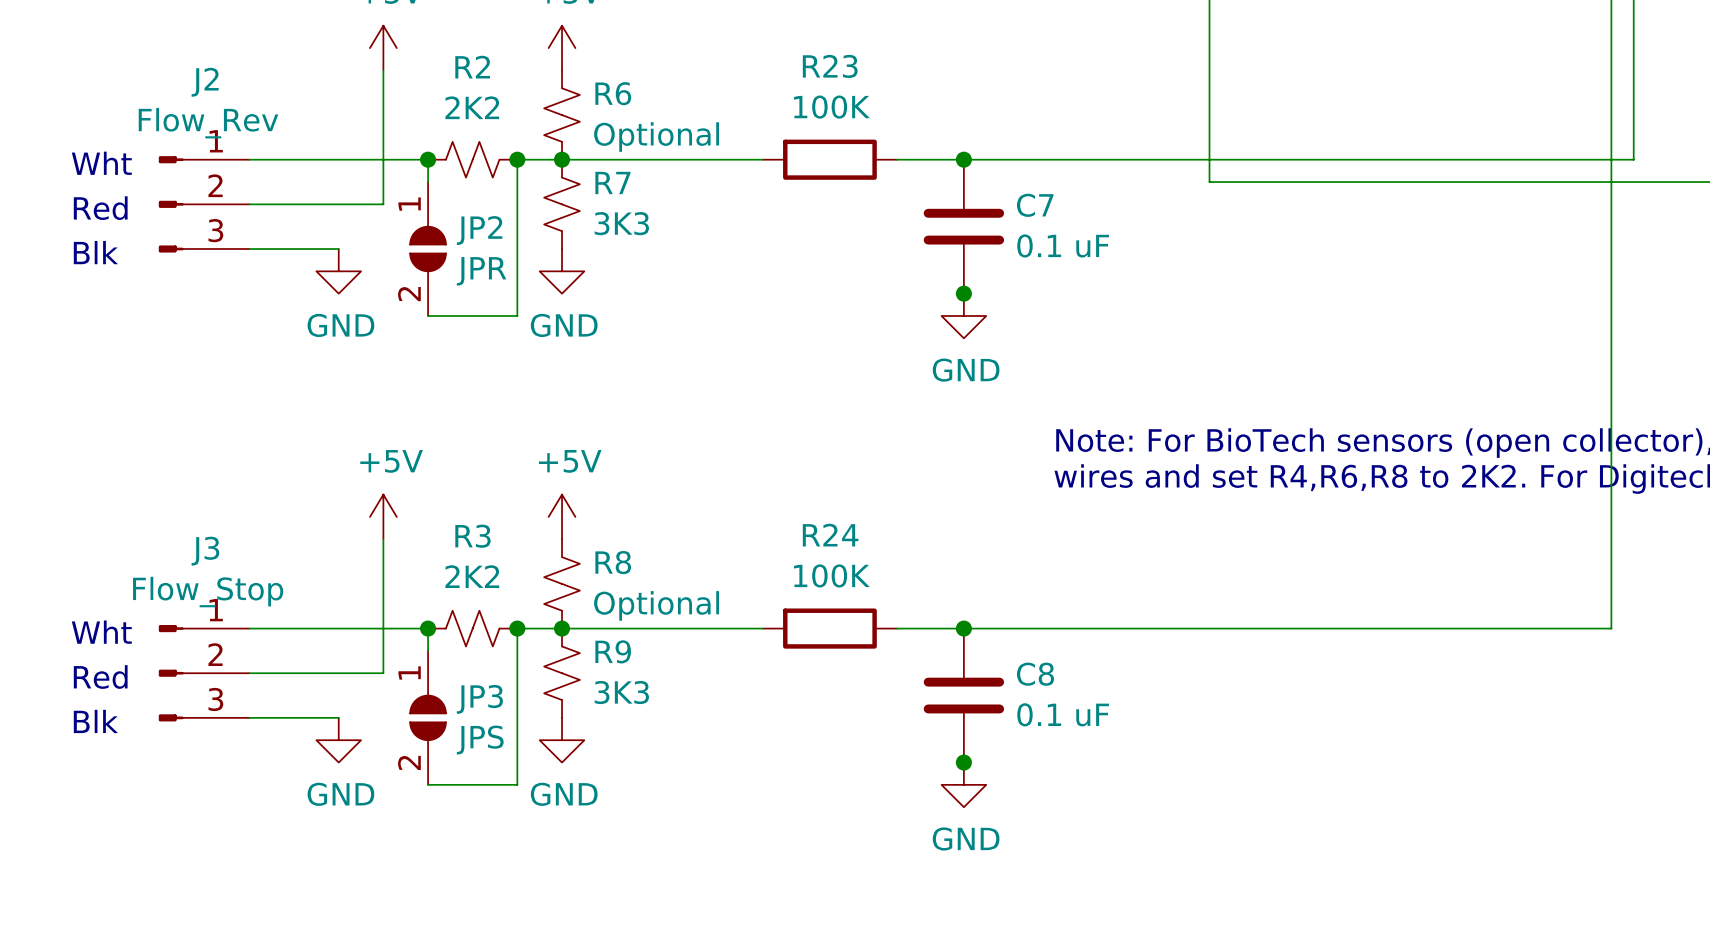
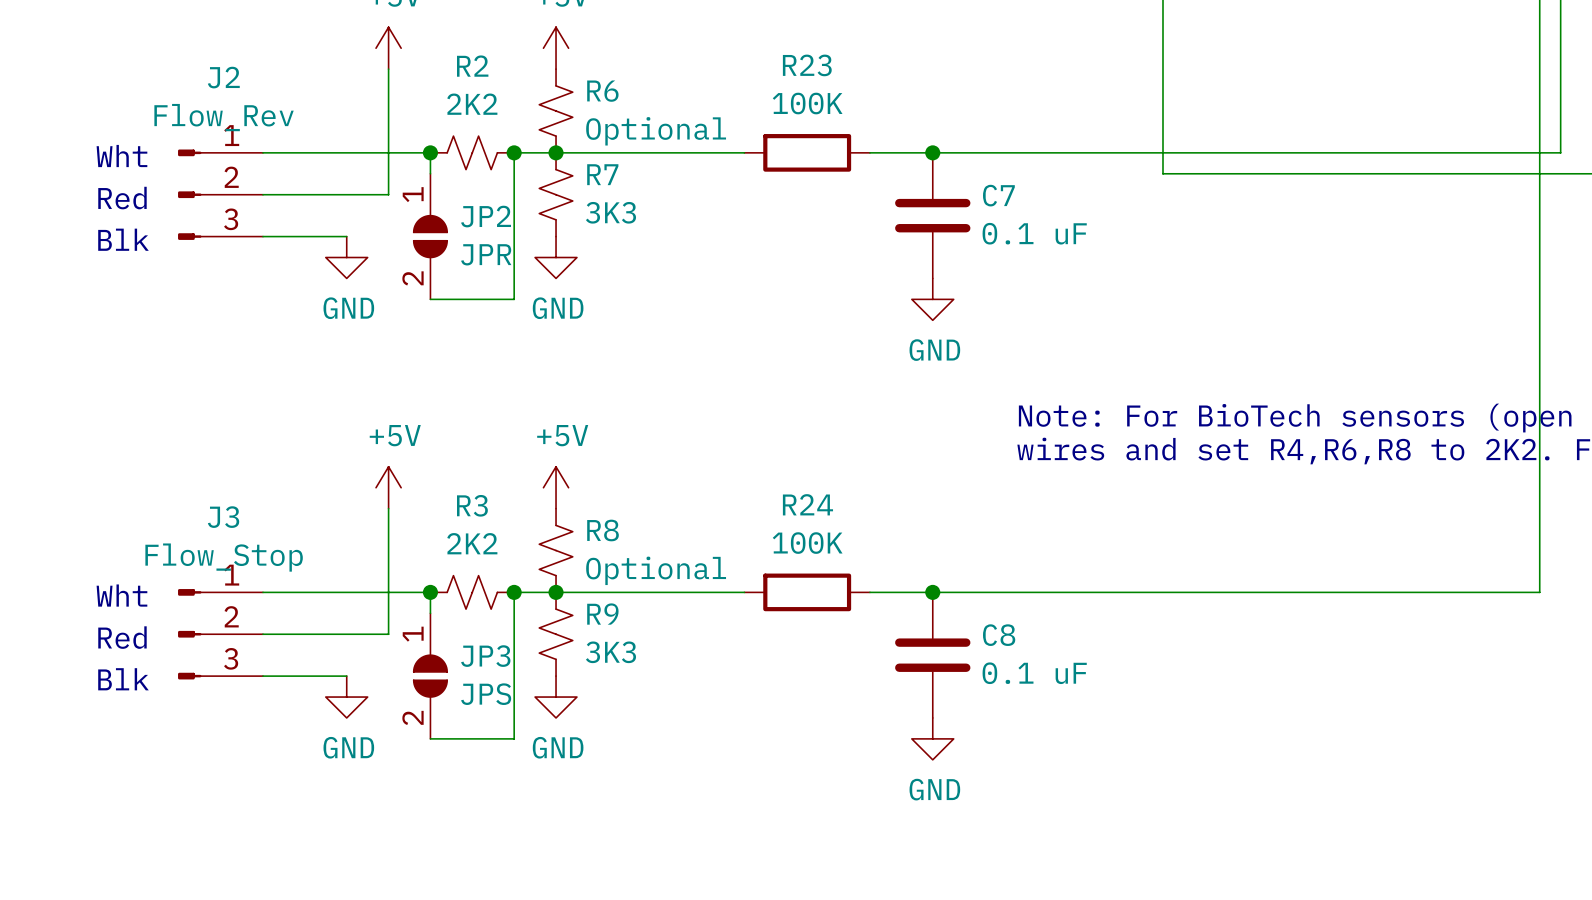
junction: (963, 293) -> none
junction: (963, 762) -> none

